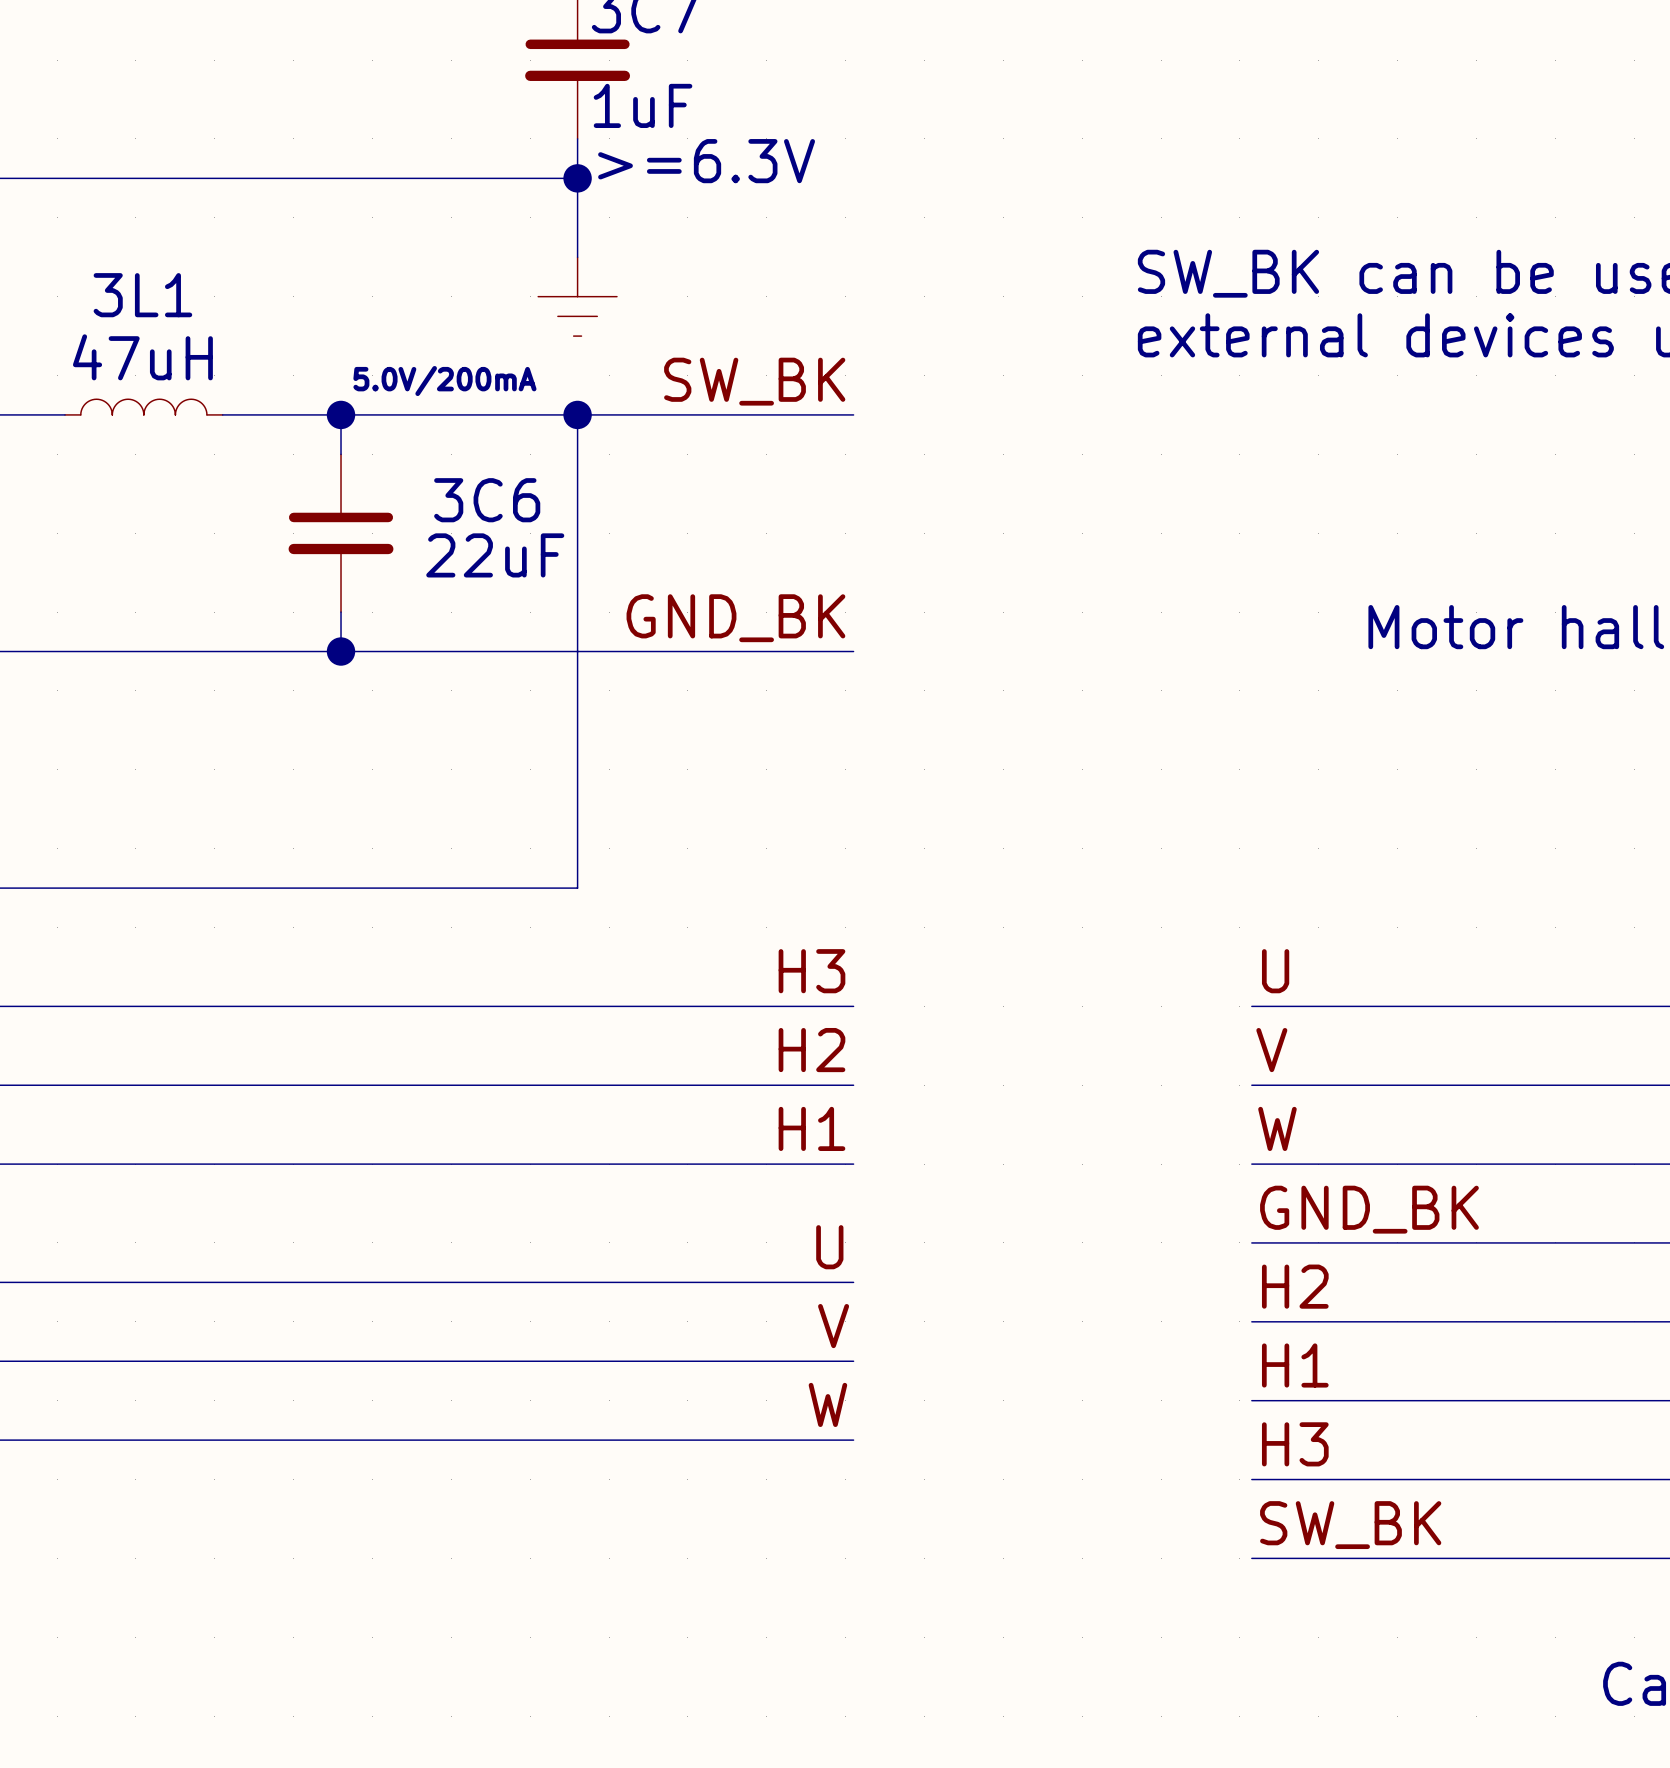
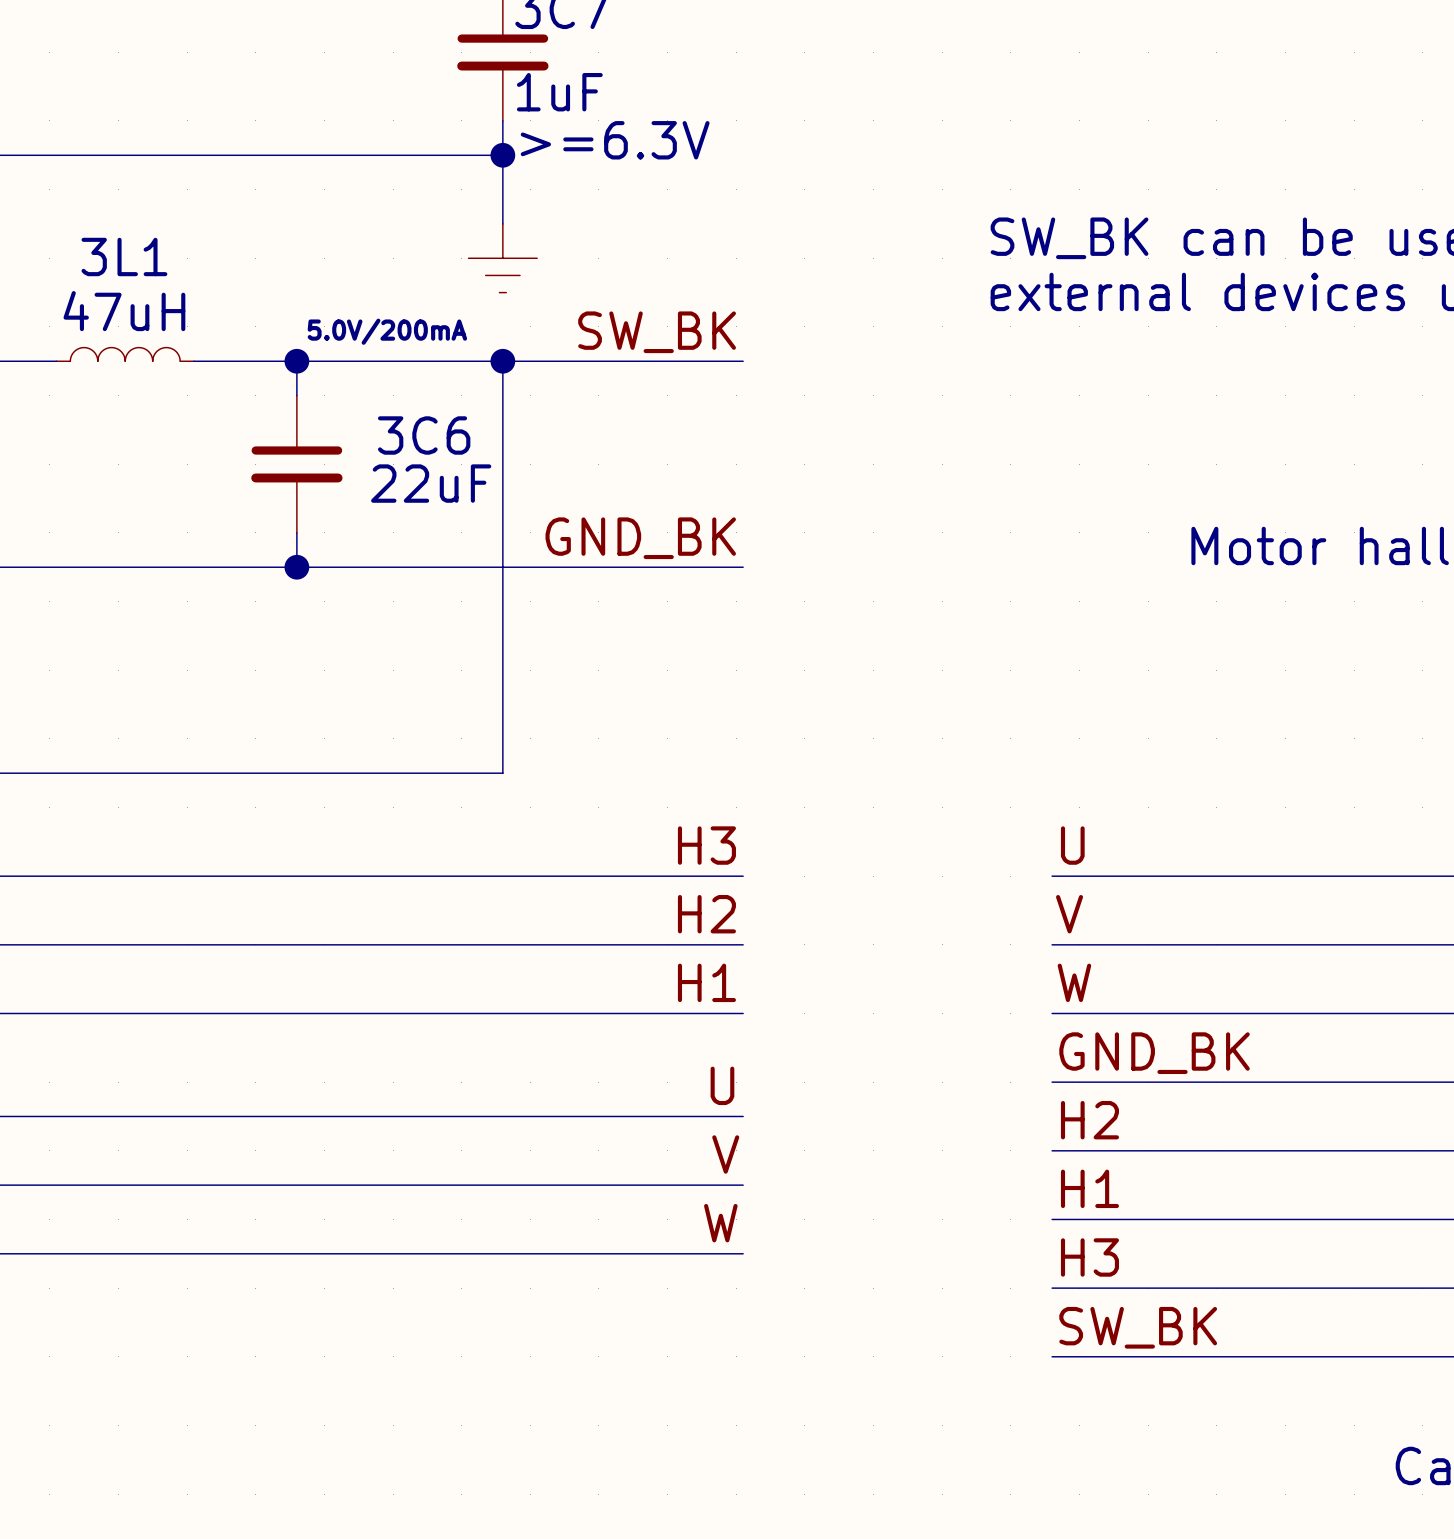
label position: U (1275, 971) -> U (1072, 845)
wire: none -> (1052, 876) (1089, 876)
label position: V (1271, 1050) -> V (1069, 914)
wire: none -> (1052, 944) (1089, 944)
label position: W (1277, 1128) -> W (1074, 982)
wire: none -> (1052, 1013) (1089, 1013)
label position: GND_BK (1369, 1209) -> GND_BK (1154, 1053)
wire: none -> (1052, 1082) (1089, 1082)
label position: H2 (1295, 1286) -> H2 (1089, 1120)
wire: none -> (1052, 1150) (1089, 1150)
label position: H1 (1295, 1365) -> H1 (1089, 1188)
wire: none -> (1052, 1219) (1089, 1219)
label position: H3 (1295, 1444) -> H3 (1089, 1257)
wire: none -> (1052, 1288) (1089, 1288)
label position: SW_BK (1350, 1525) -> SW_BK (1138, 1327)
wire: none -> (1052, 1356) (1089, 1356)

